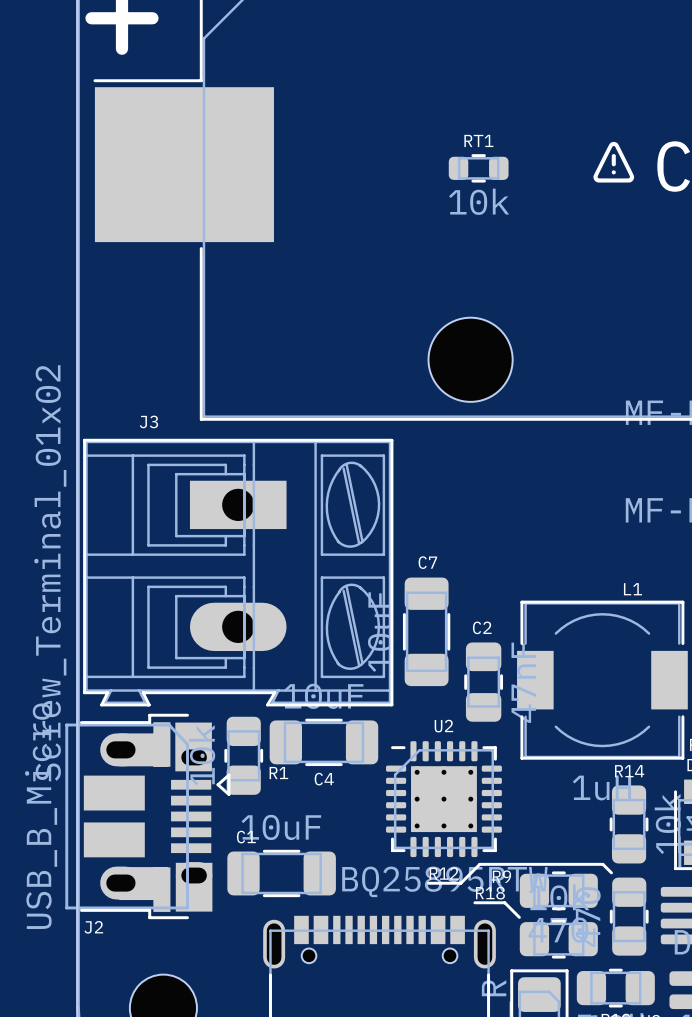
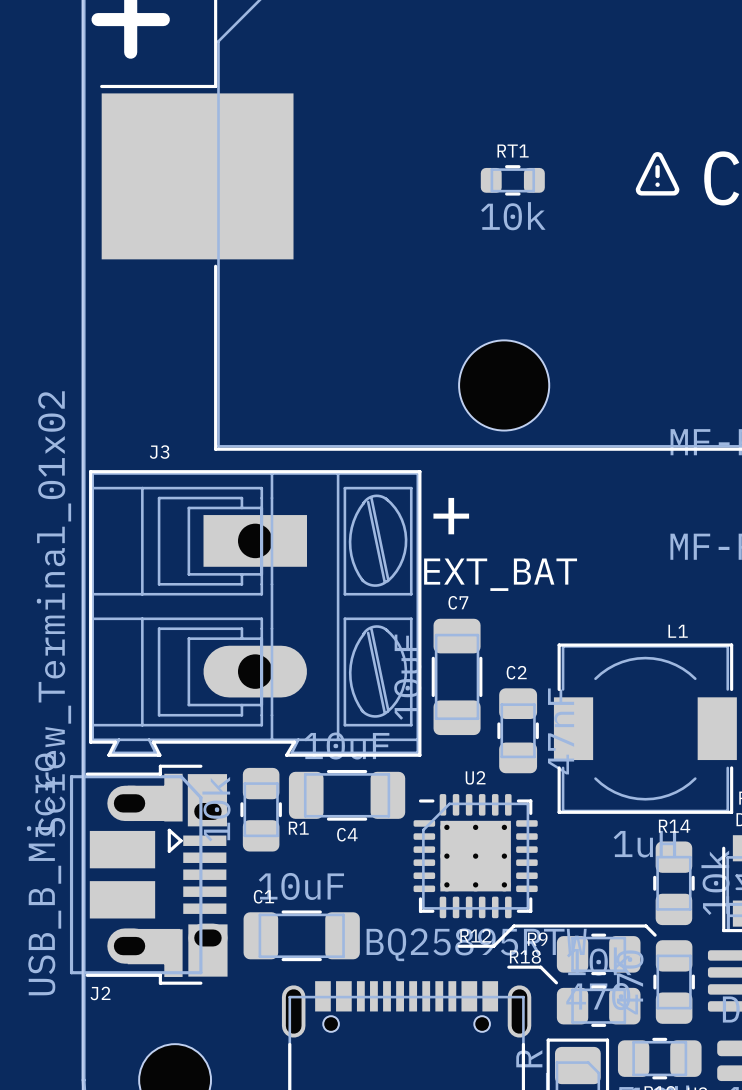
text: none -> + (451, 516)
text: none -> EXT_BAT (500, 574)
J2 footprint: [65, 713, 231, 920] -> [69, 764, 228, 985]

